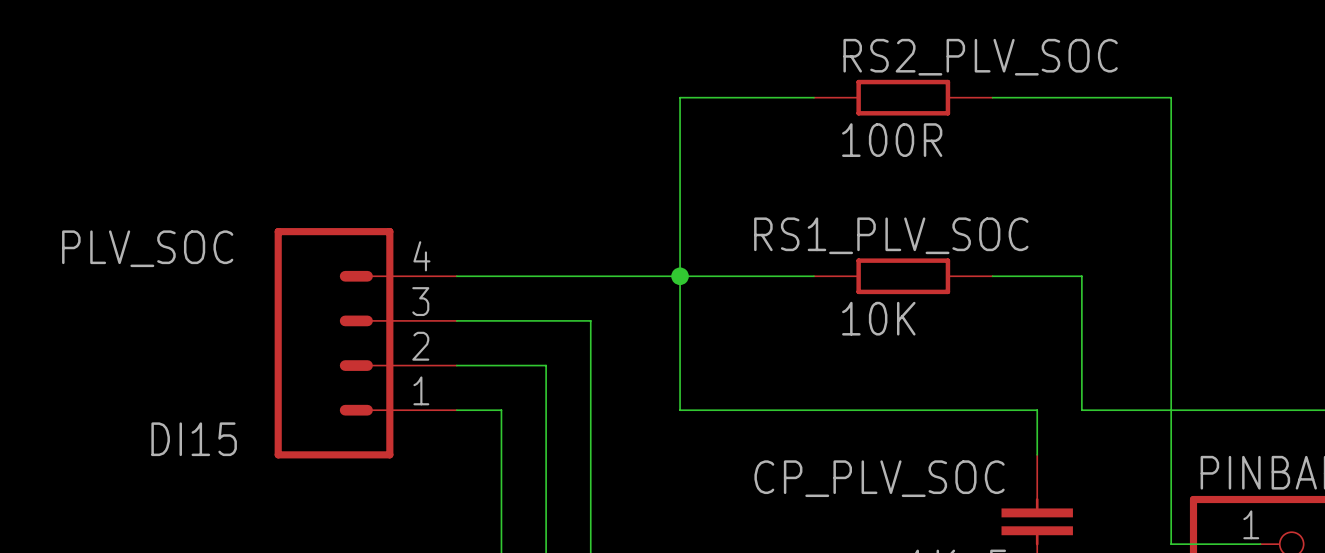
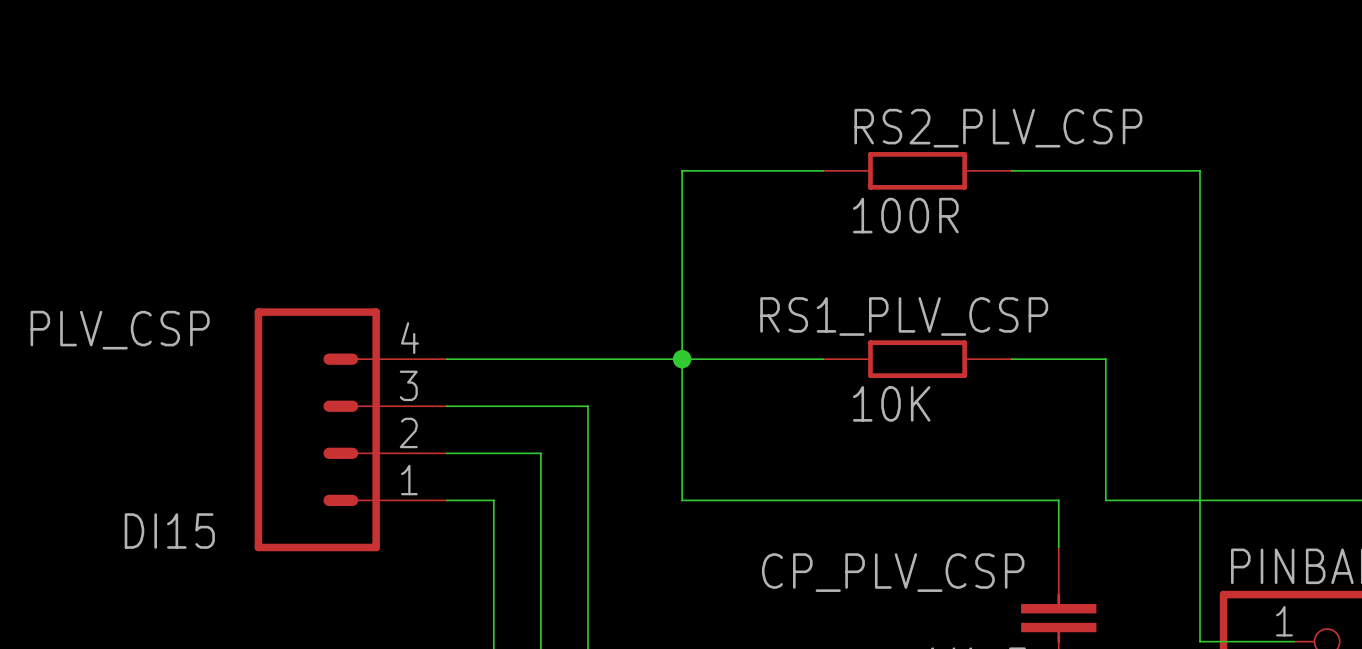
RS2_PLV_SOC name: RS2_PLV_SOC (980, 57) -> RS2_PLV_CSP (998, 128)
RS1_PLV_SOC name: RS1_PLV_SOC (891, 235) -> RS1_PLV_CSP (904, 316)
PLV_SOC name: PLV_SOC (147, 248) -> PLV_CSP (120, 330)
CP_PLV_SOC name: CP_PLV_SOC (879, 478) -> CP_PLV_CSP (893, 572)

